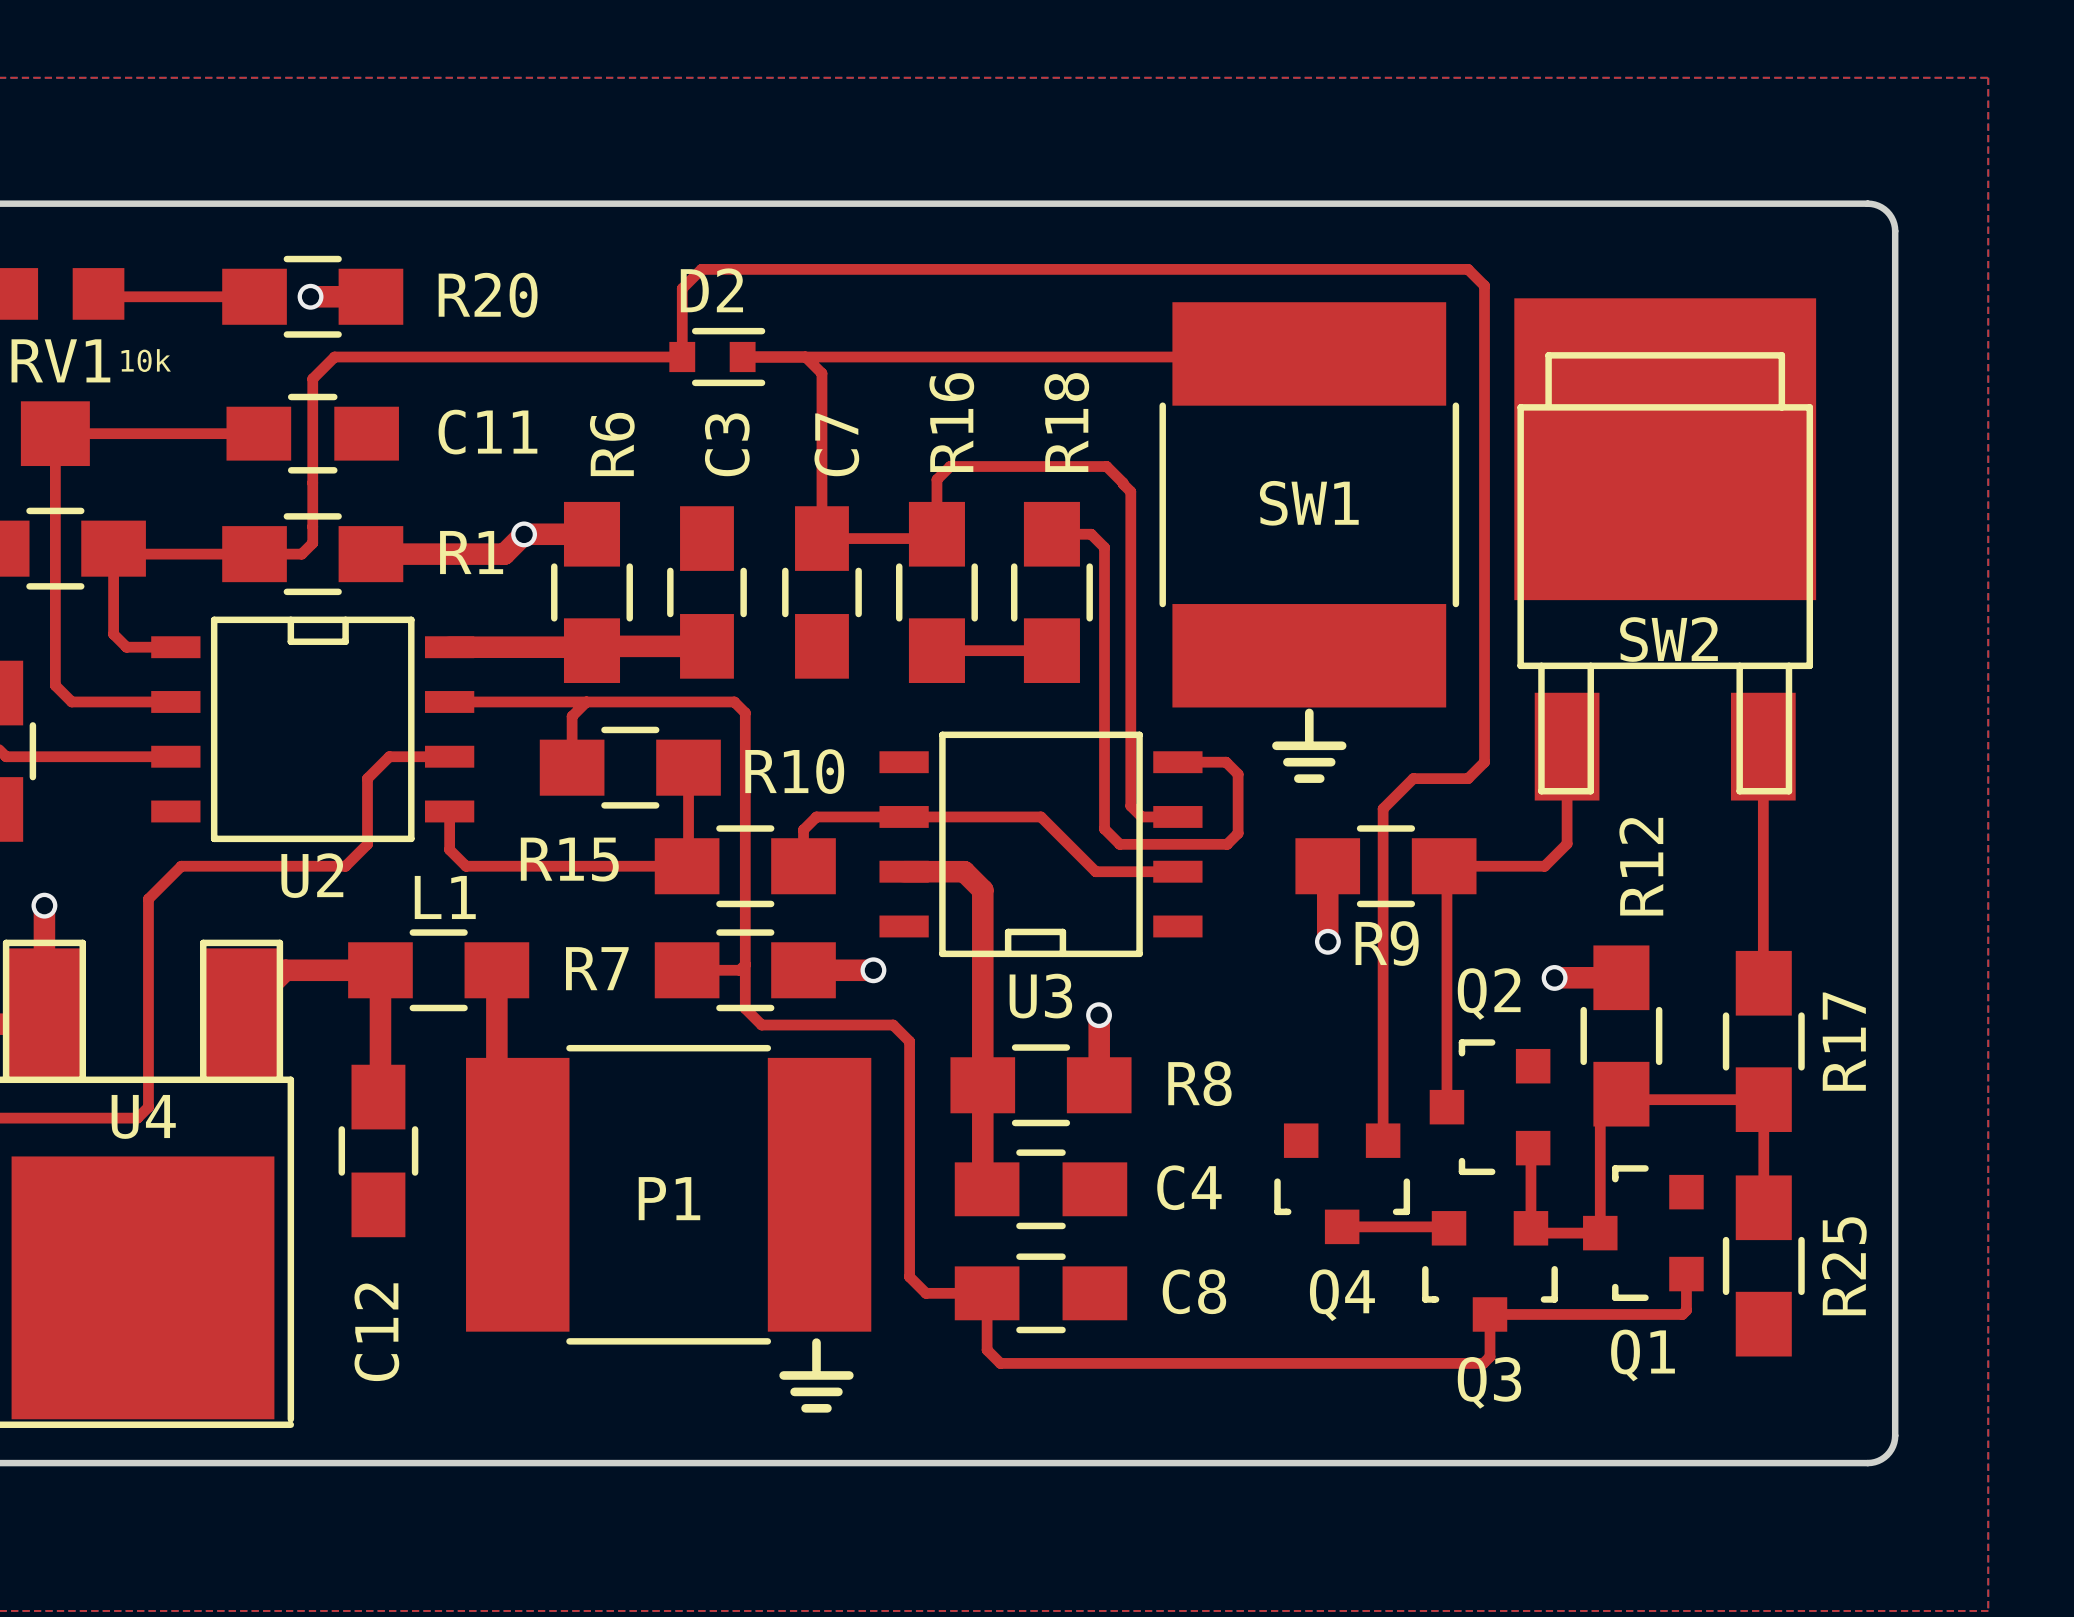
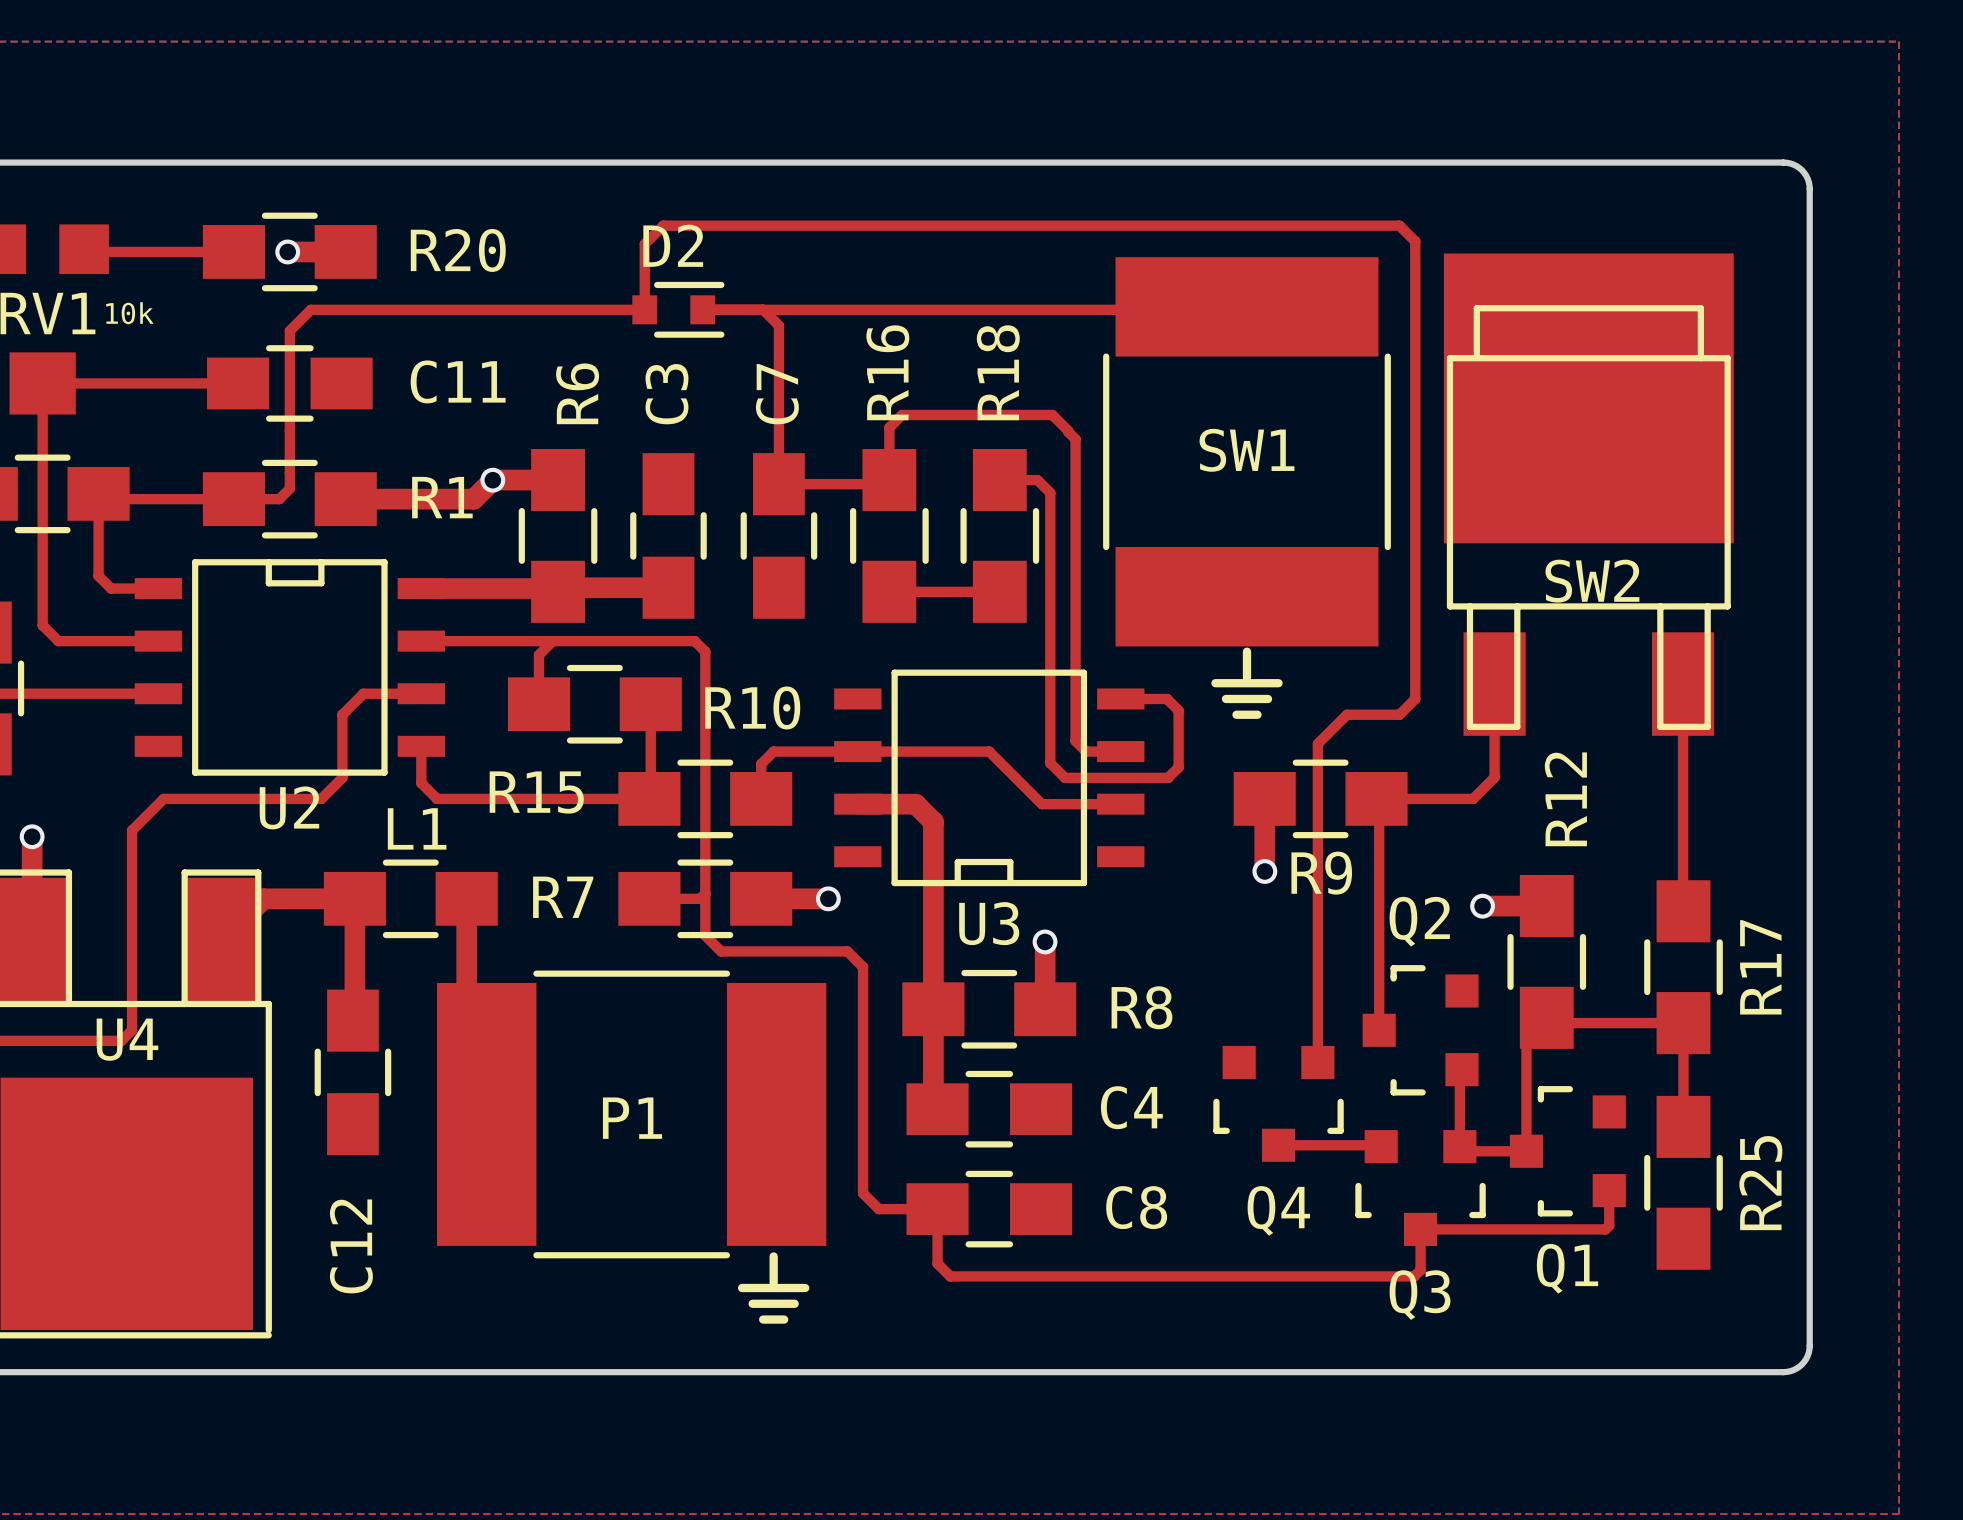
R16 name position: R16 (951, 422) -> R16 (887, 372)
R18 name position: R18 (1066, 422) -> R18 (998, 372)
C3 name position: C3 (727, 444) -> C3 (666, 394)
C7 name position: C7 (836, 444) -> C7 (777, 394)

